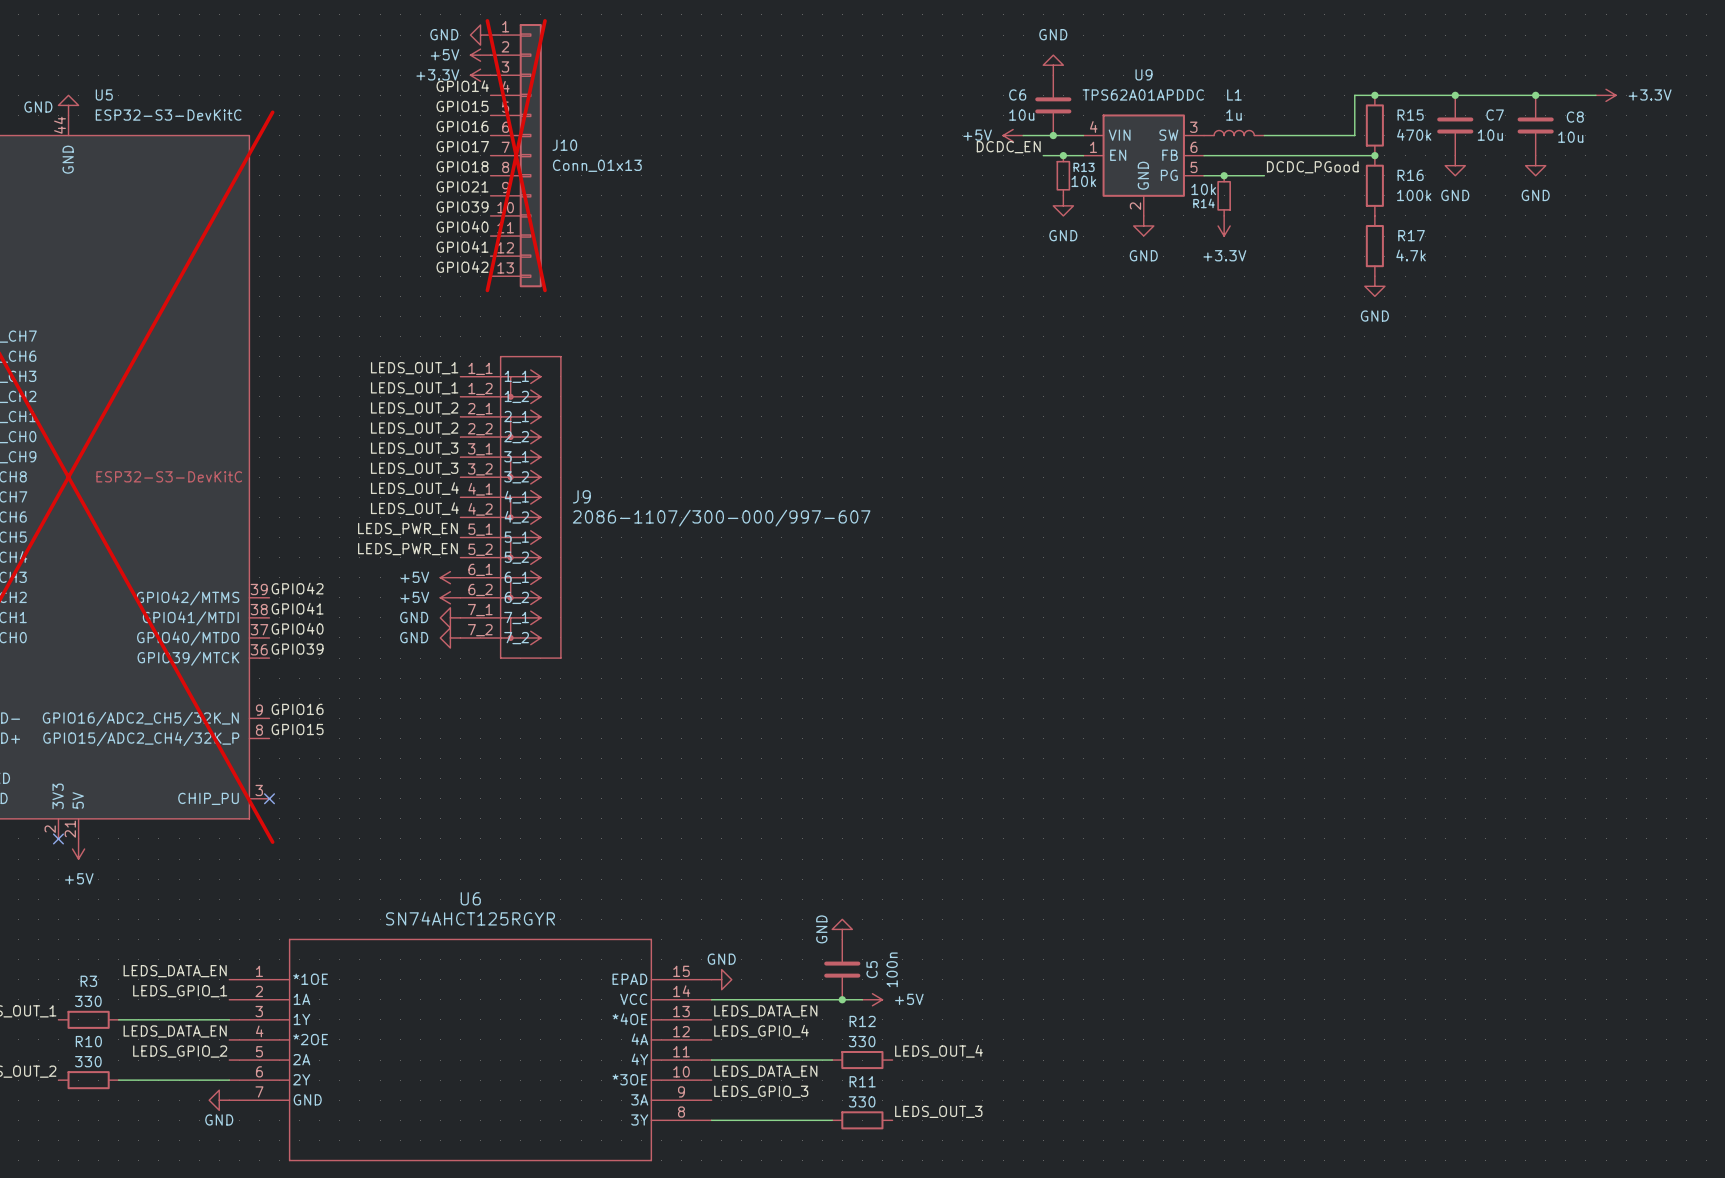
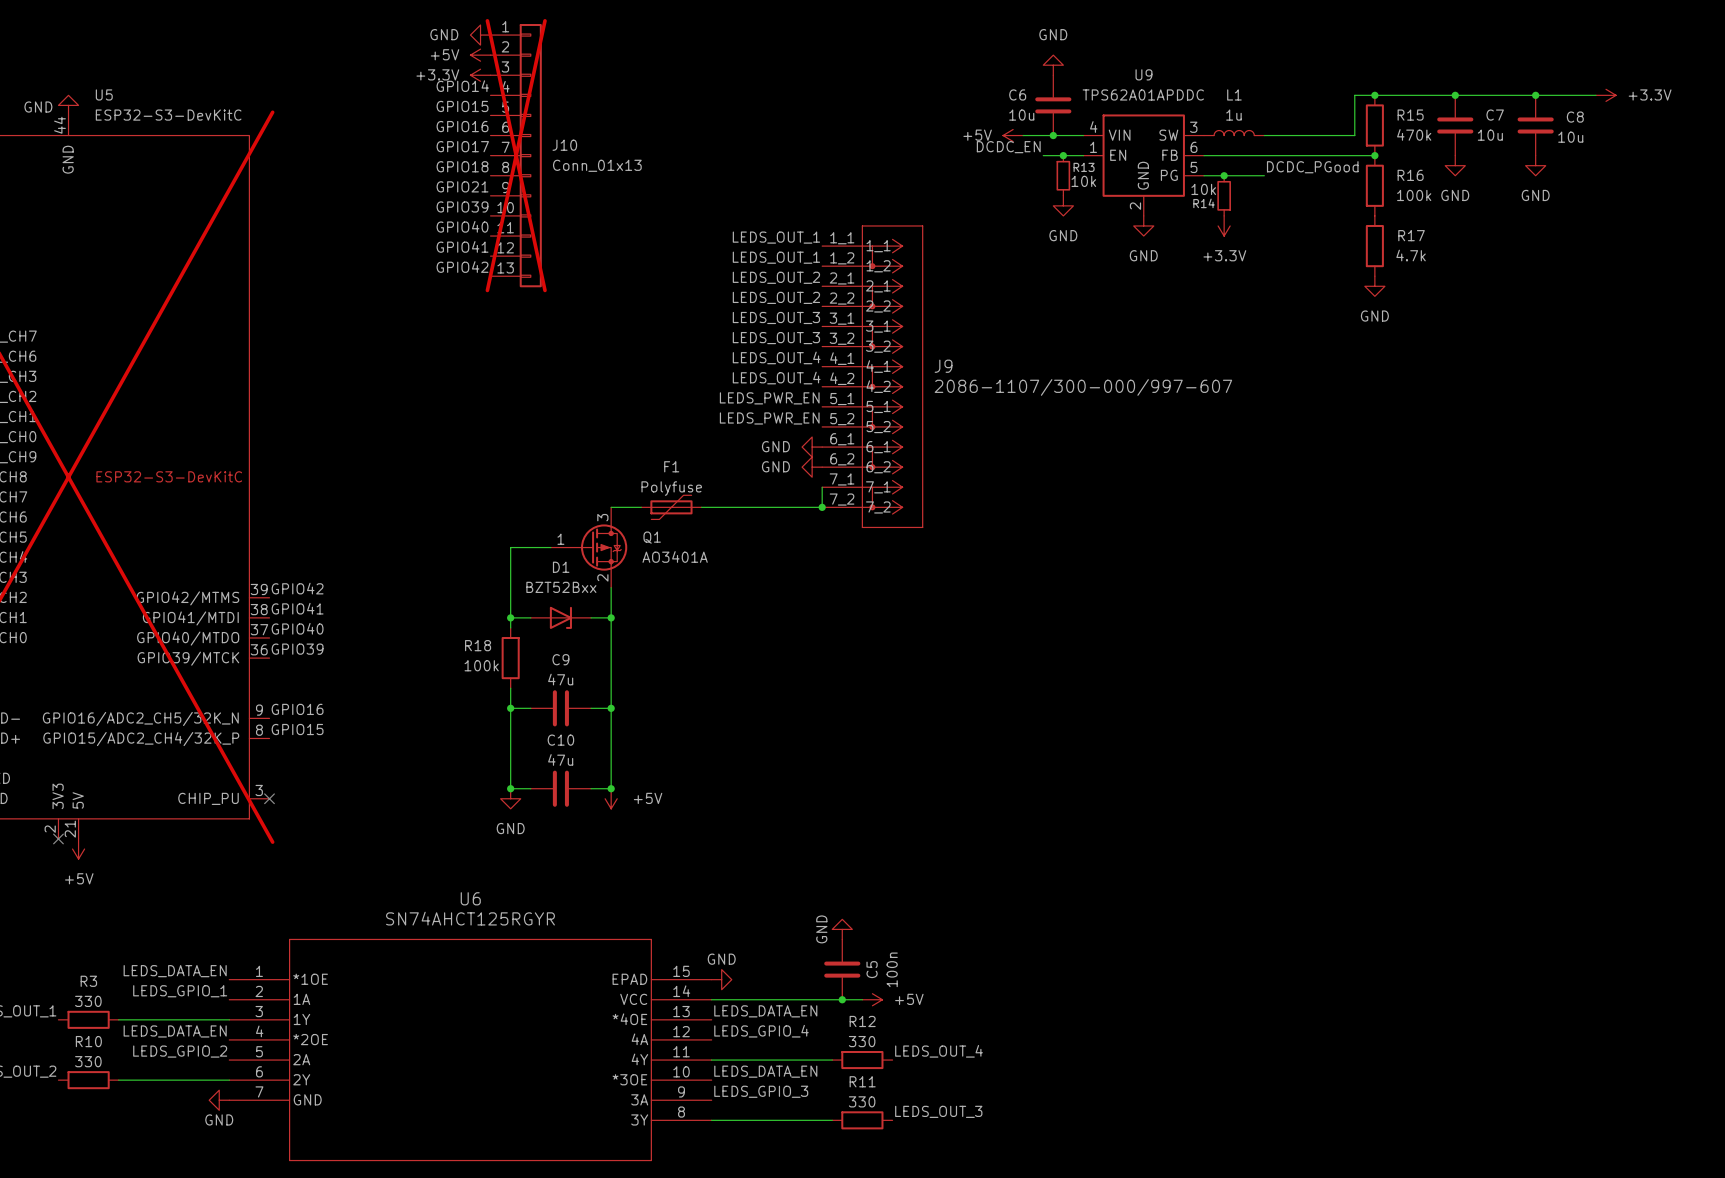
label: none -> LEDS_OUT_1 (776, 237)
label: none -> LEDS_OUT_1 (776, 257)
label: none -> LEDS_OUT_2 (776, 277)
label: none -> LEDS_OUT_2 (776, 297)
label: none -> LEDS_OUT_3 (776, 317)
label: none -> LEDS_OUT_3 (776, 338)
label: none -> LEDS_OUT_4 (776, 357)
label: LEDS_OUT_1 (414, 368) -> none
label: none -> LEDS_OUT_4 (776, 378)
label: LEDS_OUT_1 (414, 388) -> none
label: none -> LEDS_PWR_EN (769, 398)
label: LEDS_OUT_2 (414, 408) -> none
label: none -> LEDS_PWR_EN (769, 418)
label: LEDS_OUT_2 (414, 428) -> none
power symbol: none -> GND (812, 447)
label: LEDS_OUT_3 (414, 448) -> none
power symbol: none -> GND (812, 467)
label: LEDS_OUT_3 (414, 468) -> none
wire: none -> (822, 487) (822, 507) (701, 507)
label: LEDS_OUT_4 (414, 488) -> none
J9 position: (510, 507) -> (872, 376)
wire: none -> (611, 507) (641, 507)
F1: none -> Polyfuse (671, 507)
junction: none -> (822, 507)
label: LEDS_OUT_4 (414, 508) -> none
label: LEDS_PWR_EN (407, 529) -> none
wire: none -> (550, 547) (510, 547) (510, 627)
Q1: none -> AO3401A (589, 547)
label: LEDS_PWR_EN (407, 549) -> none
power symbol: +5V (450, 577) -> none
wire: none -> (611, 587) (611, 788) (591, 788)
power symbol: +5V (450, 597) -> none
power symbol: GND (450, 617) -> none
junction: none -> (510, 617)
D1: none -> BZT52Bxx (560, 617)
wire: none -> (591, 617) (611, 617)
junction: none -> (611, 617)
power symbol: GND (450, 637) -> none
R18: none -> 100k (510, 658)
wire: none -> (510, 688) (510, 788) (530, 788)
wire: none -> (510, 708) (530, 708)
junction: none -> (510, 708)
C9: none -> 47u (560, 708)
wire: none -> (591, 708) (611, 708)
junction: none -> (611, 708)
junction: none -> (510, 788)
C10: none -> 47u (560, 788)
junction: none -> (611, 788)
power symbol: none -> GND (510, 798)
power symbol: none -> +5V (611, 798)

